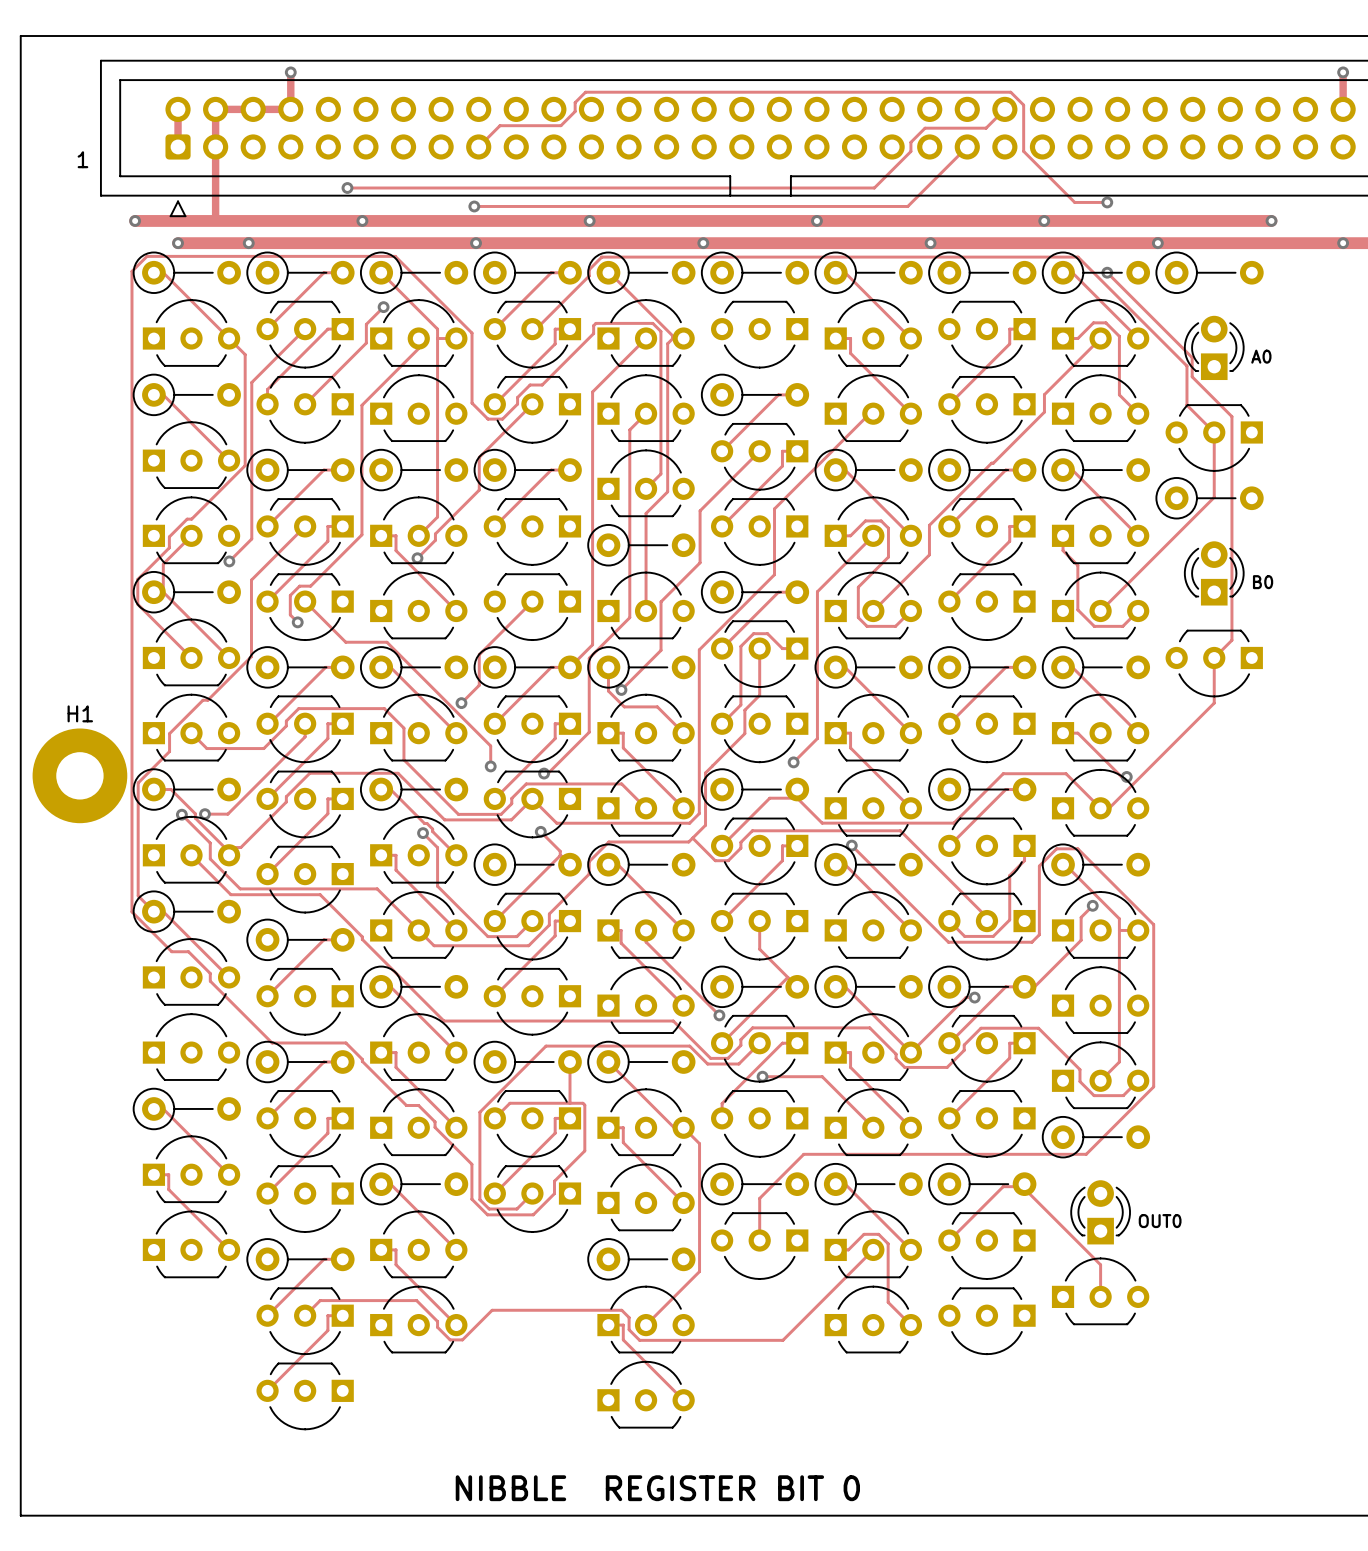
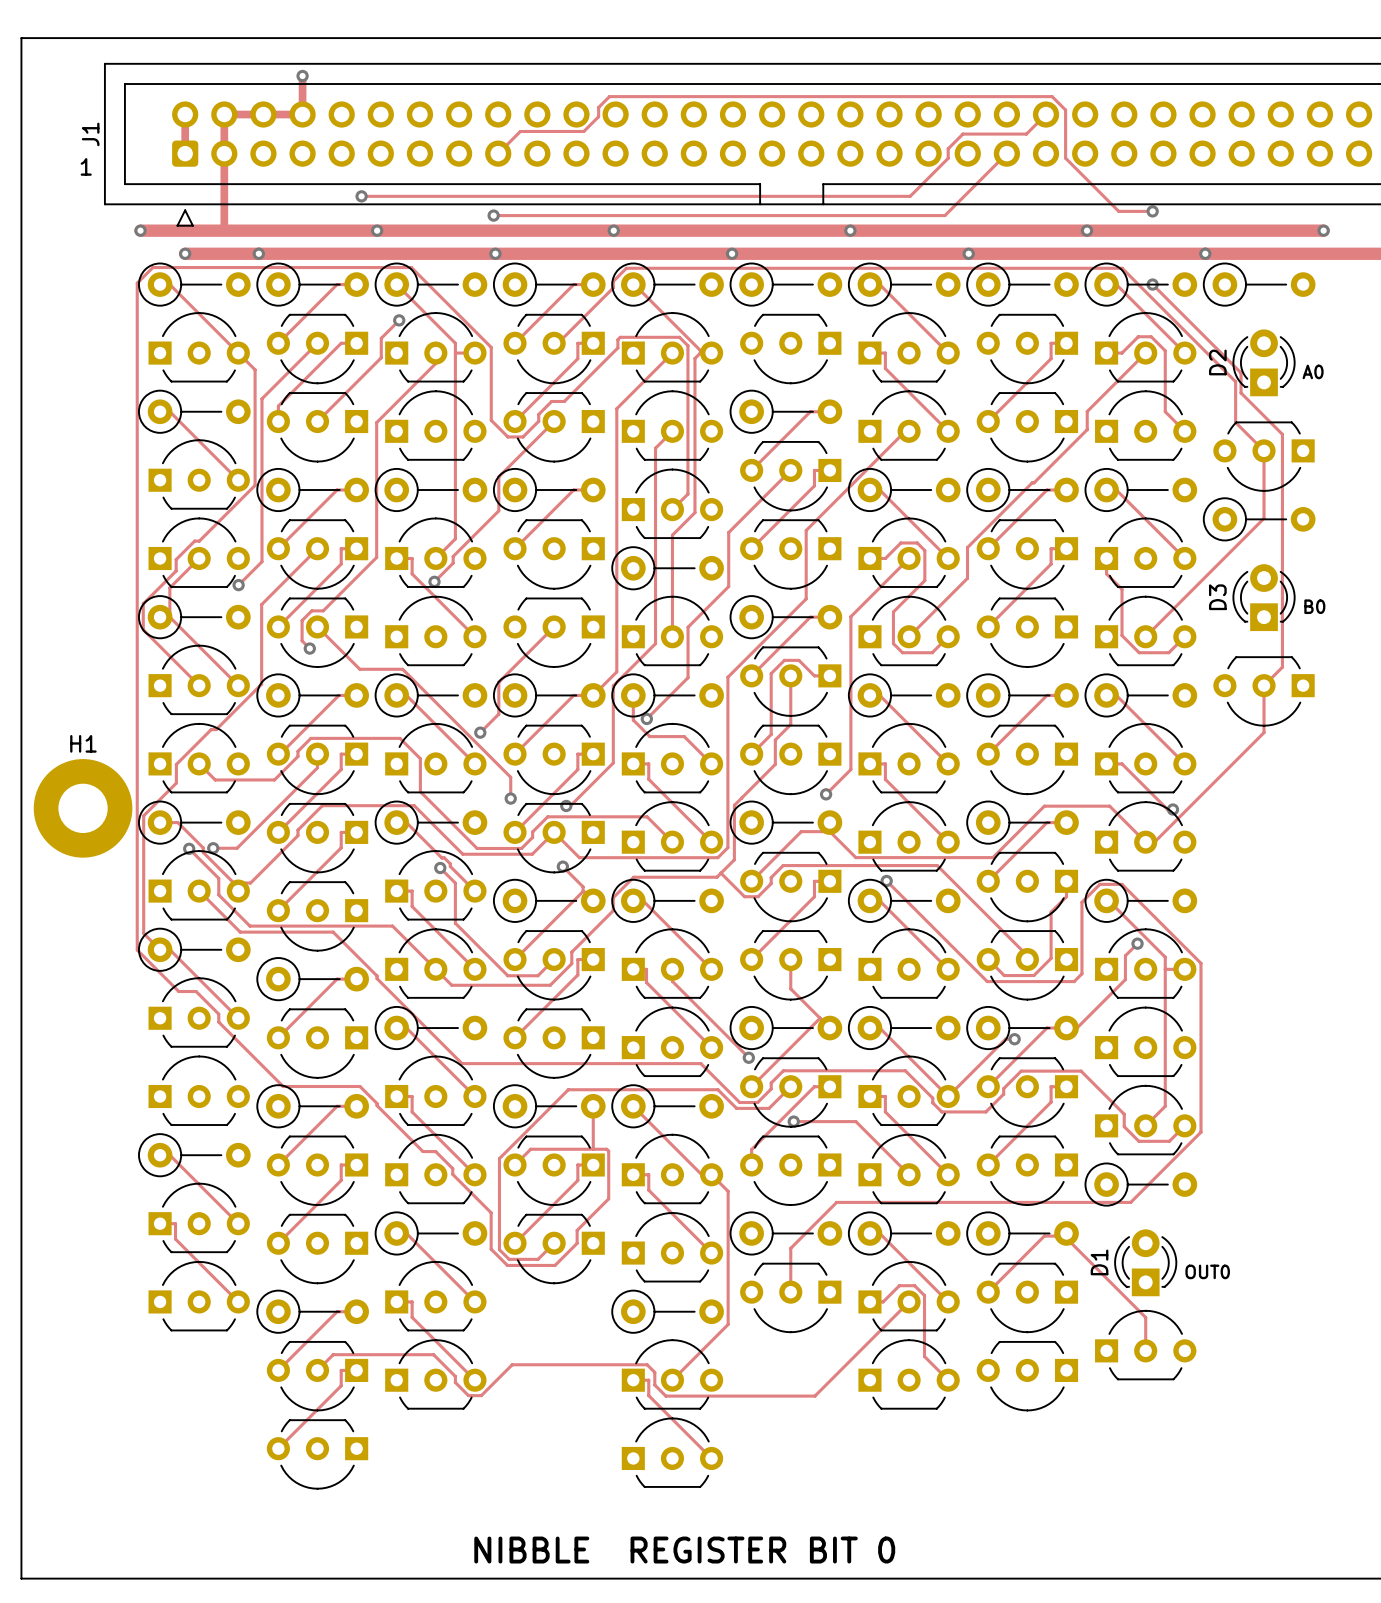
J1 name: none -> J1 (90, 134)
D2 name: none -> D2 (1217, 362)
D3 name: none -> D3 (1217, 597)
D1 name: none -> D1 (1099, 1262)

